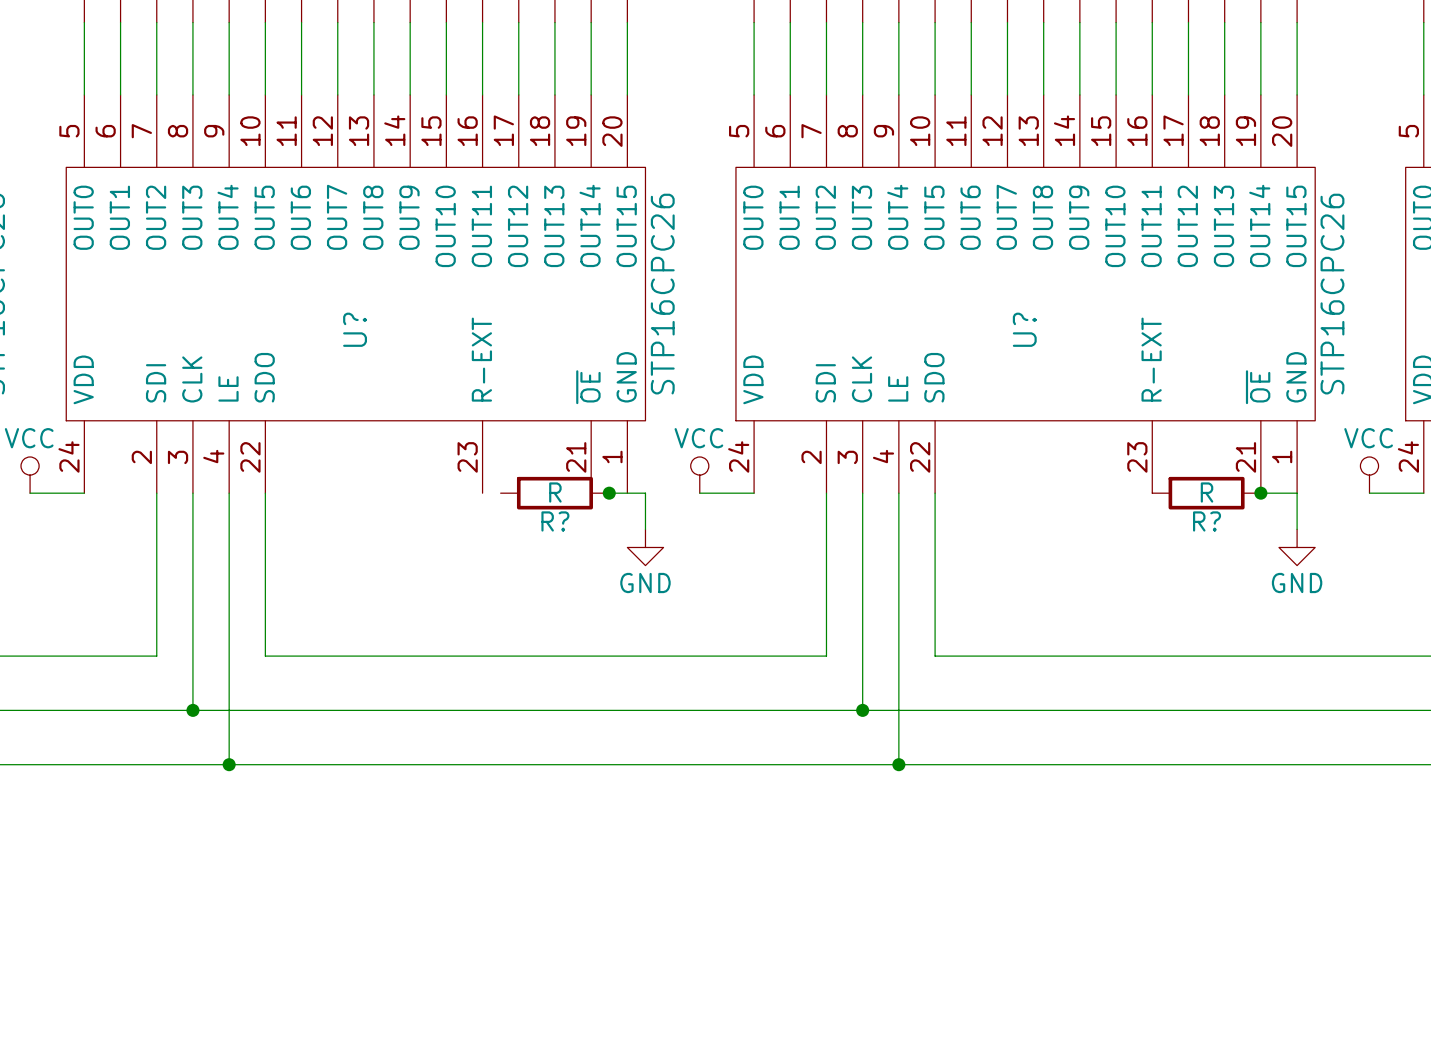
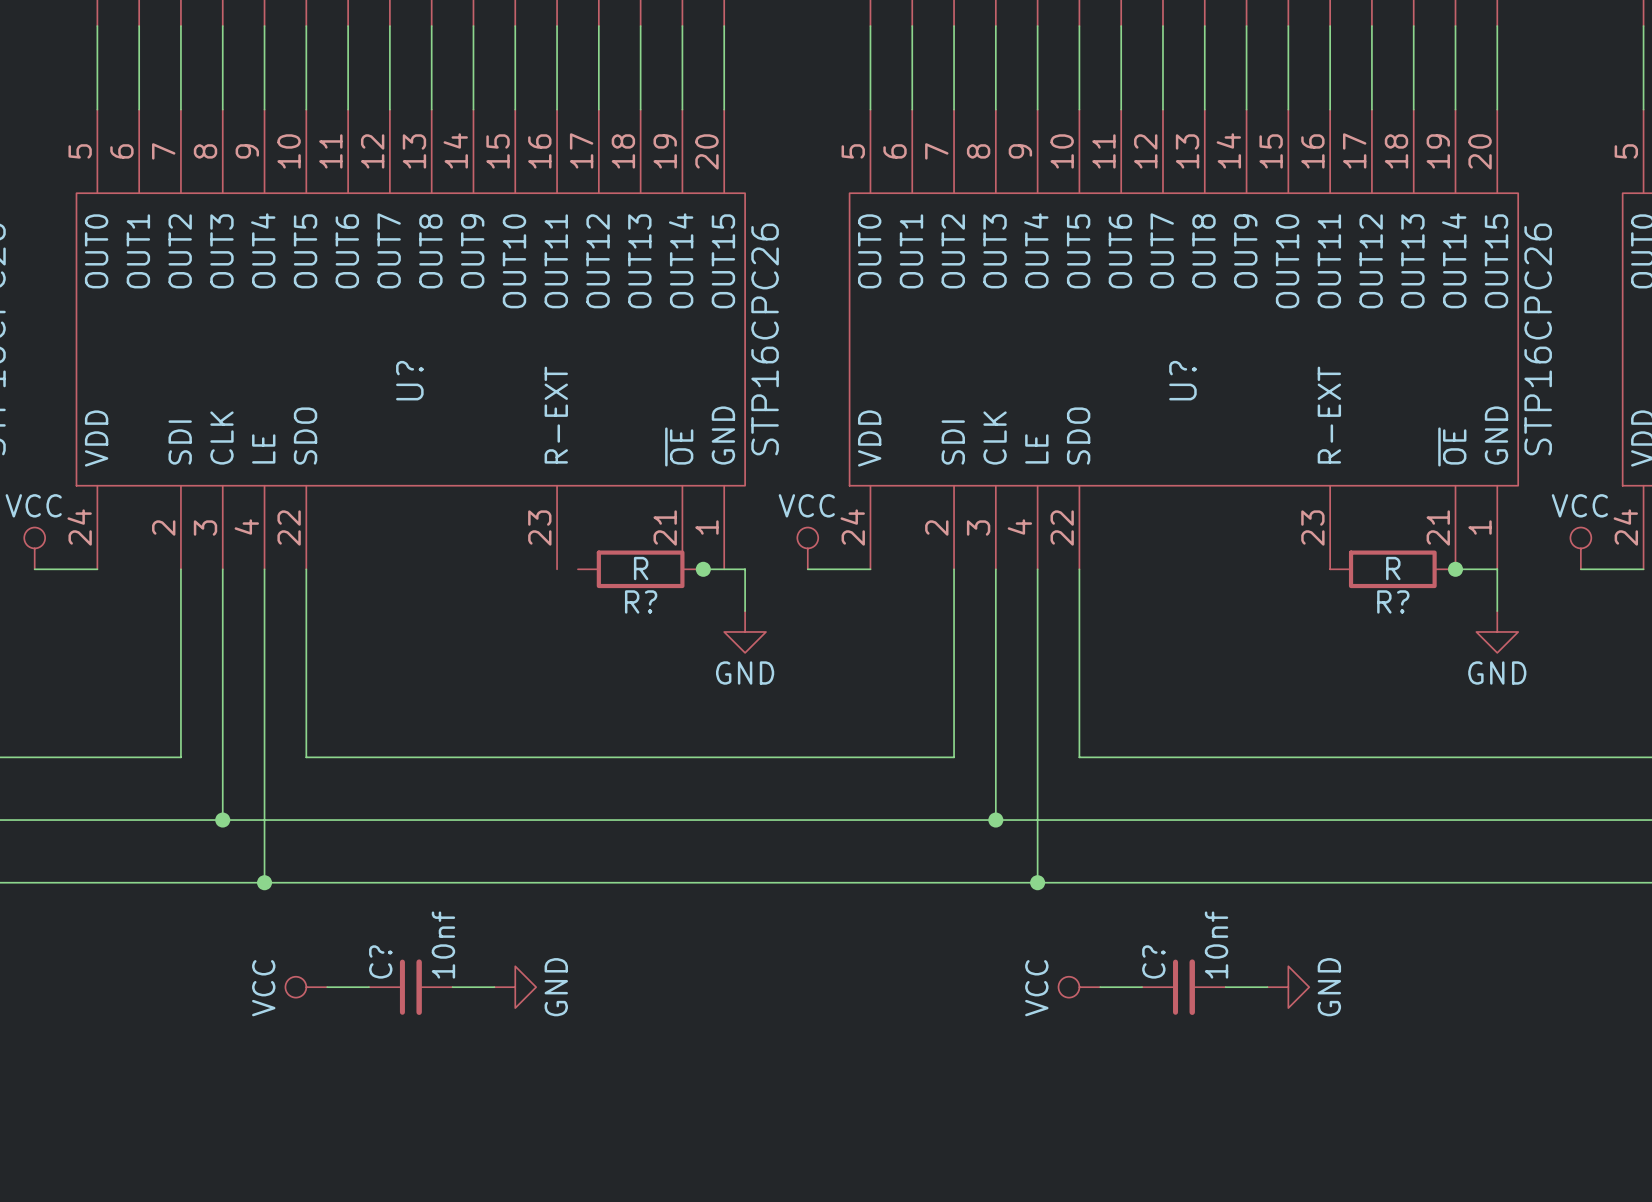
power symbol: none -> VCC (306, 987)
wire: none -> (327, 987) (369, 987)
C?: none -> 10nf (410, 987)
wire: none -> (452, 987) (494, 987)
power symbol: none -> GND (515, 987)
power symbol: none -> VCC (1079, 987)
wire: none -> (1100, 987) (1142, 987)
C?: none -> 10nf (1183, 987)
wire: none -> (1225, 987) (1267, 987)
power symbol: none -> GND (1288, 987)

